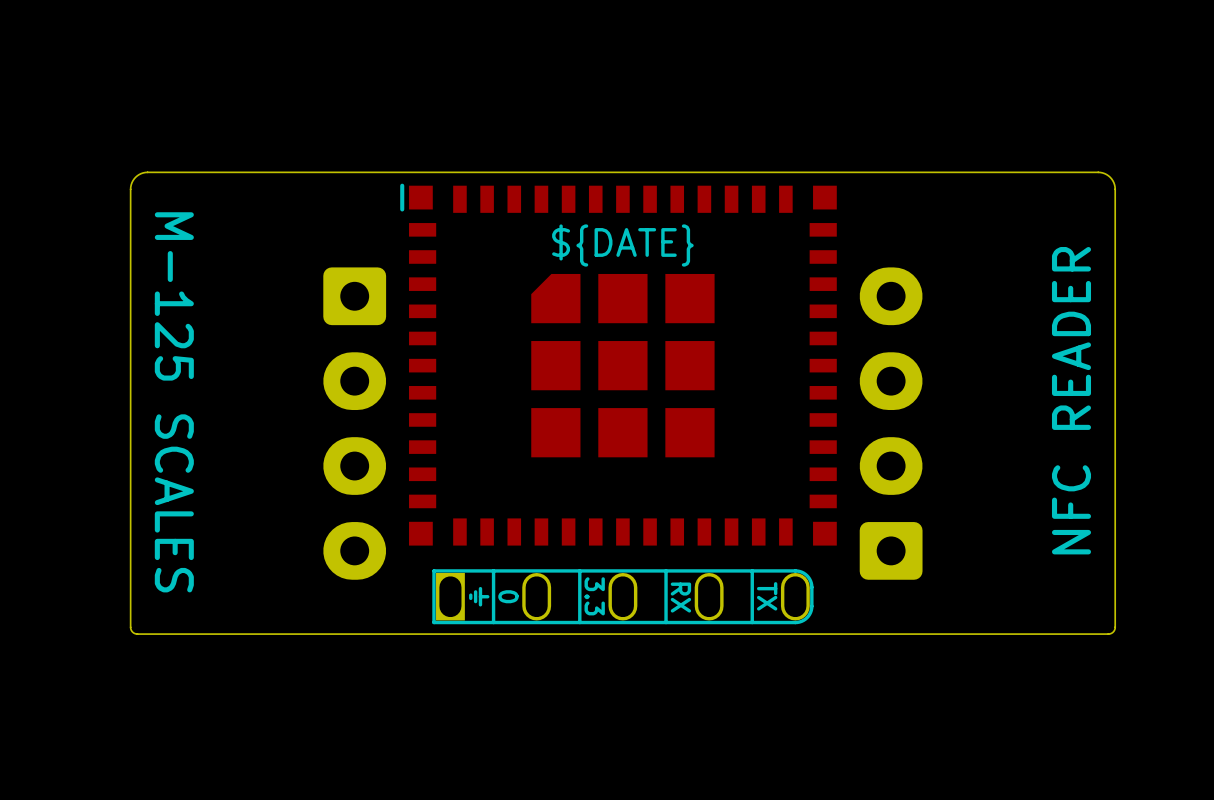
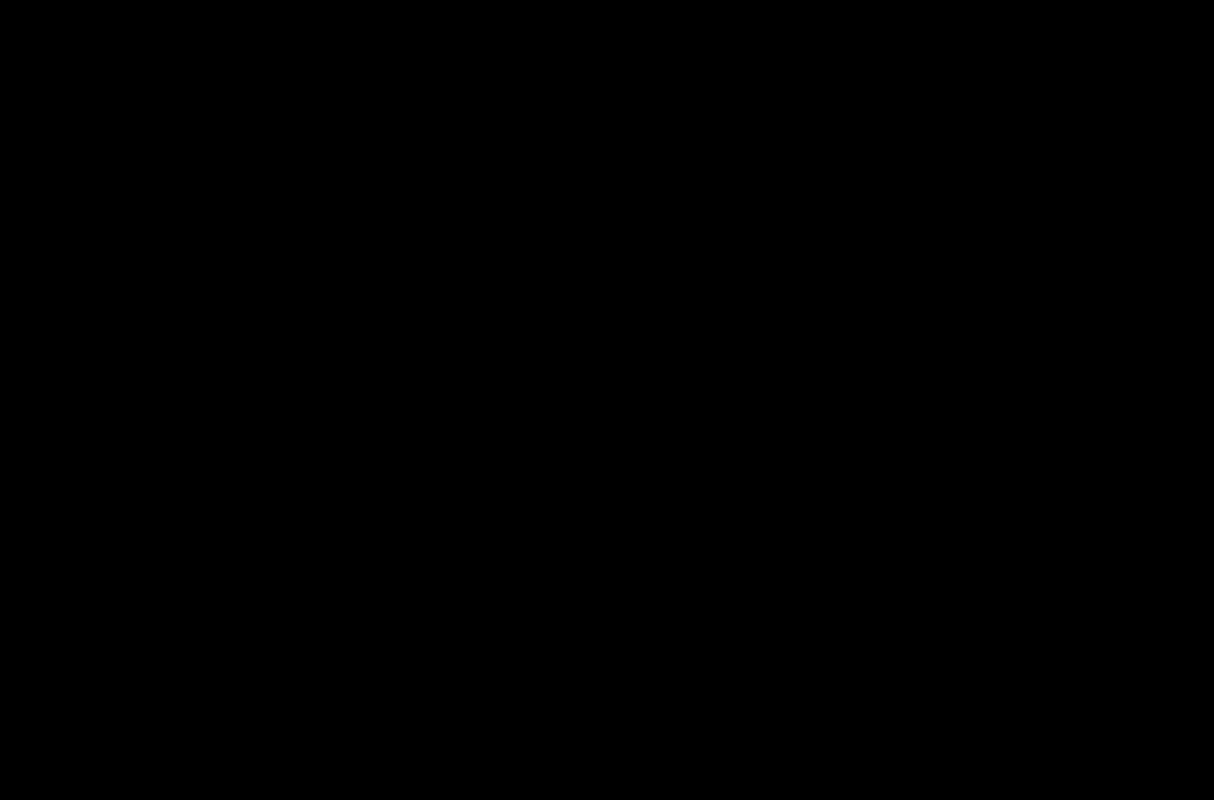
board edge: (147, 172) (1104, 173) (1111, 178) (1115, 189) (1114, 629) (1108, 634) (134, 633) (130, 627) (130, 189) (135, 177) (147, 172) -> none
part: (618, 364) -> none
text: NFC READER (1071, 400) -> none
text: M-125 SCALES (174, 402) -> none
part: (354, 423) -> none
part: (891, 423) -> none
part: (622, 596) -> none

